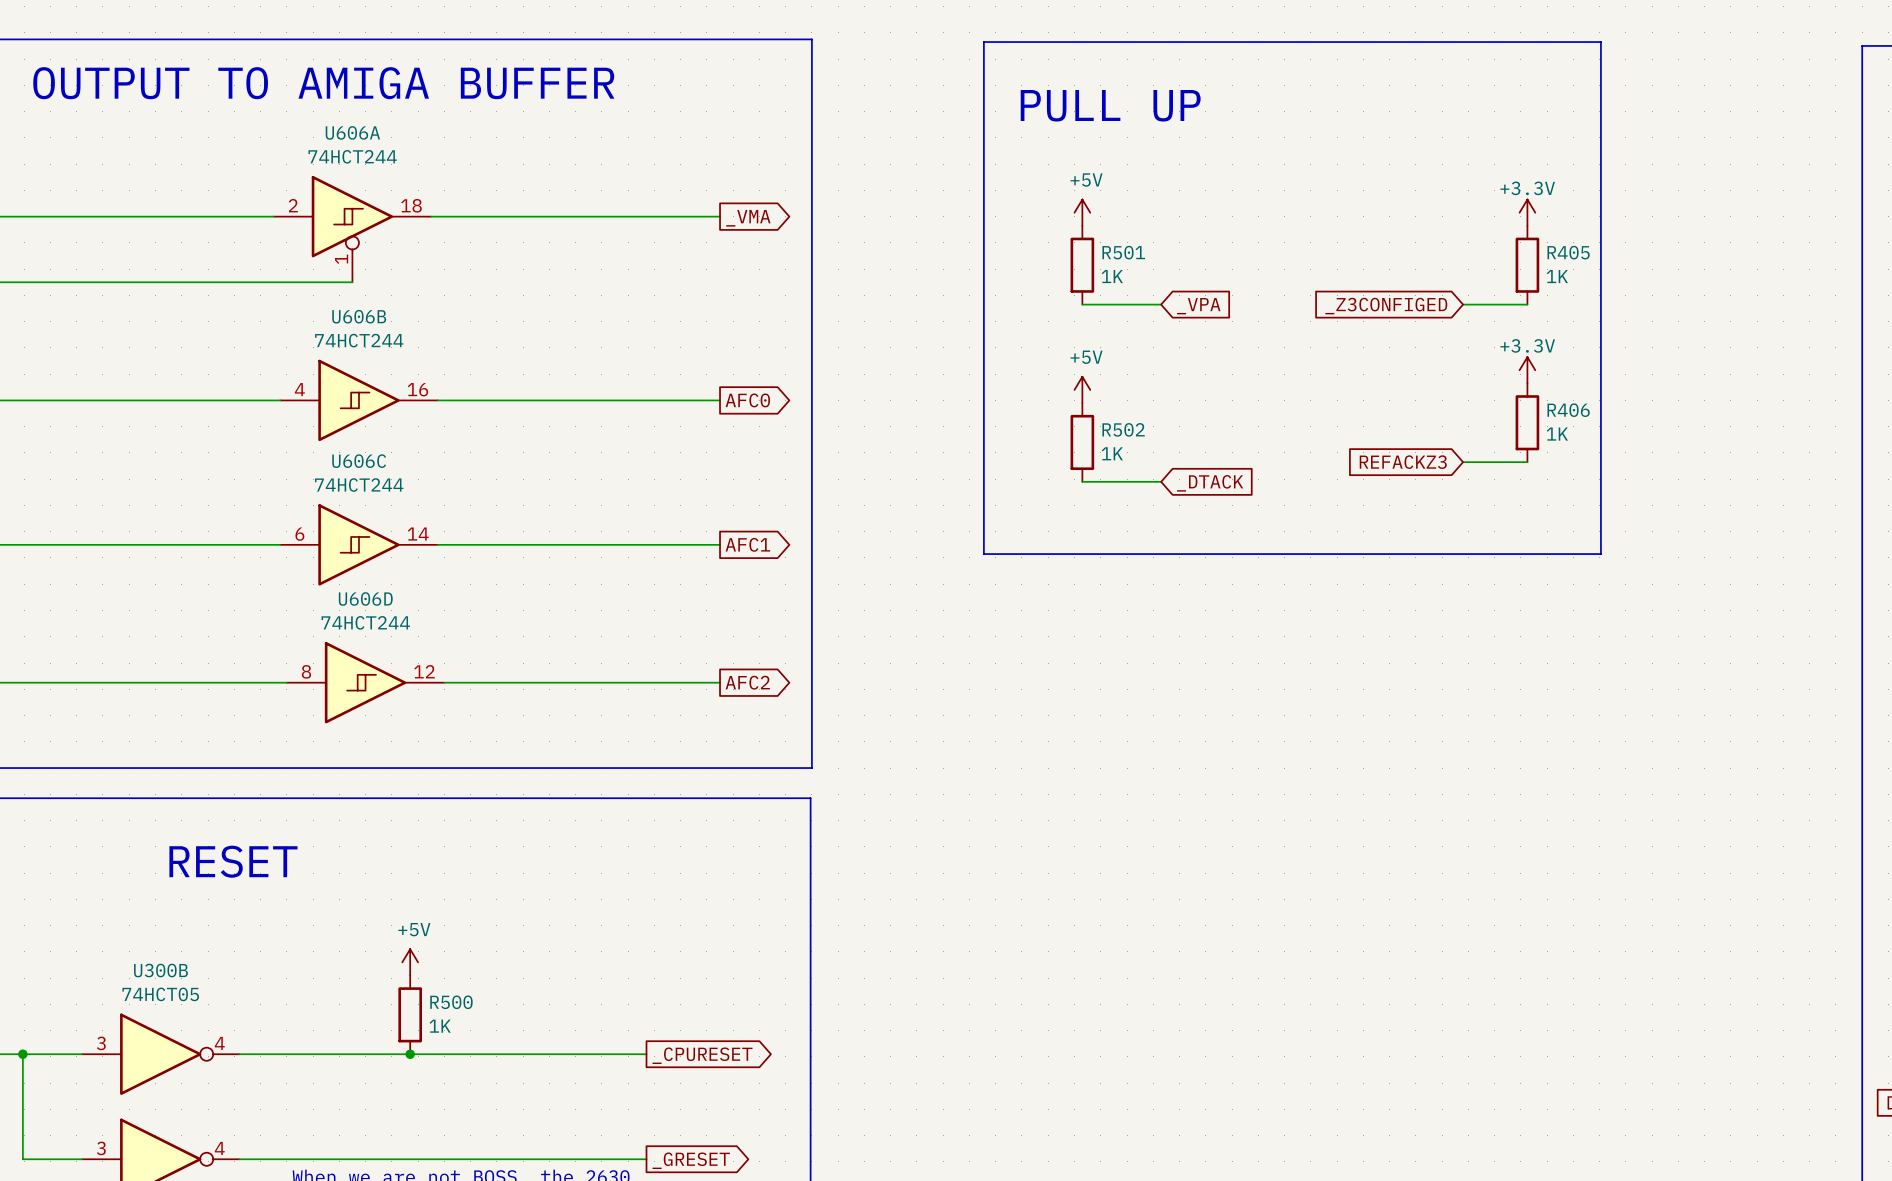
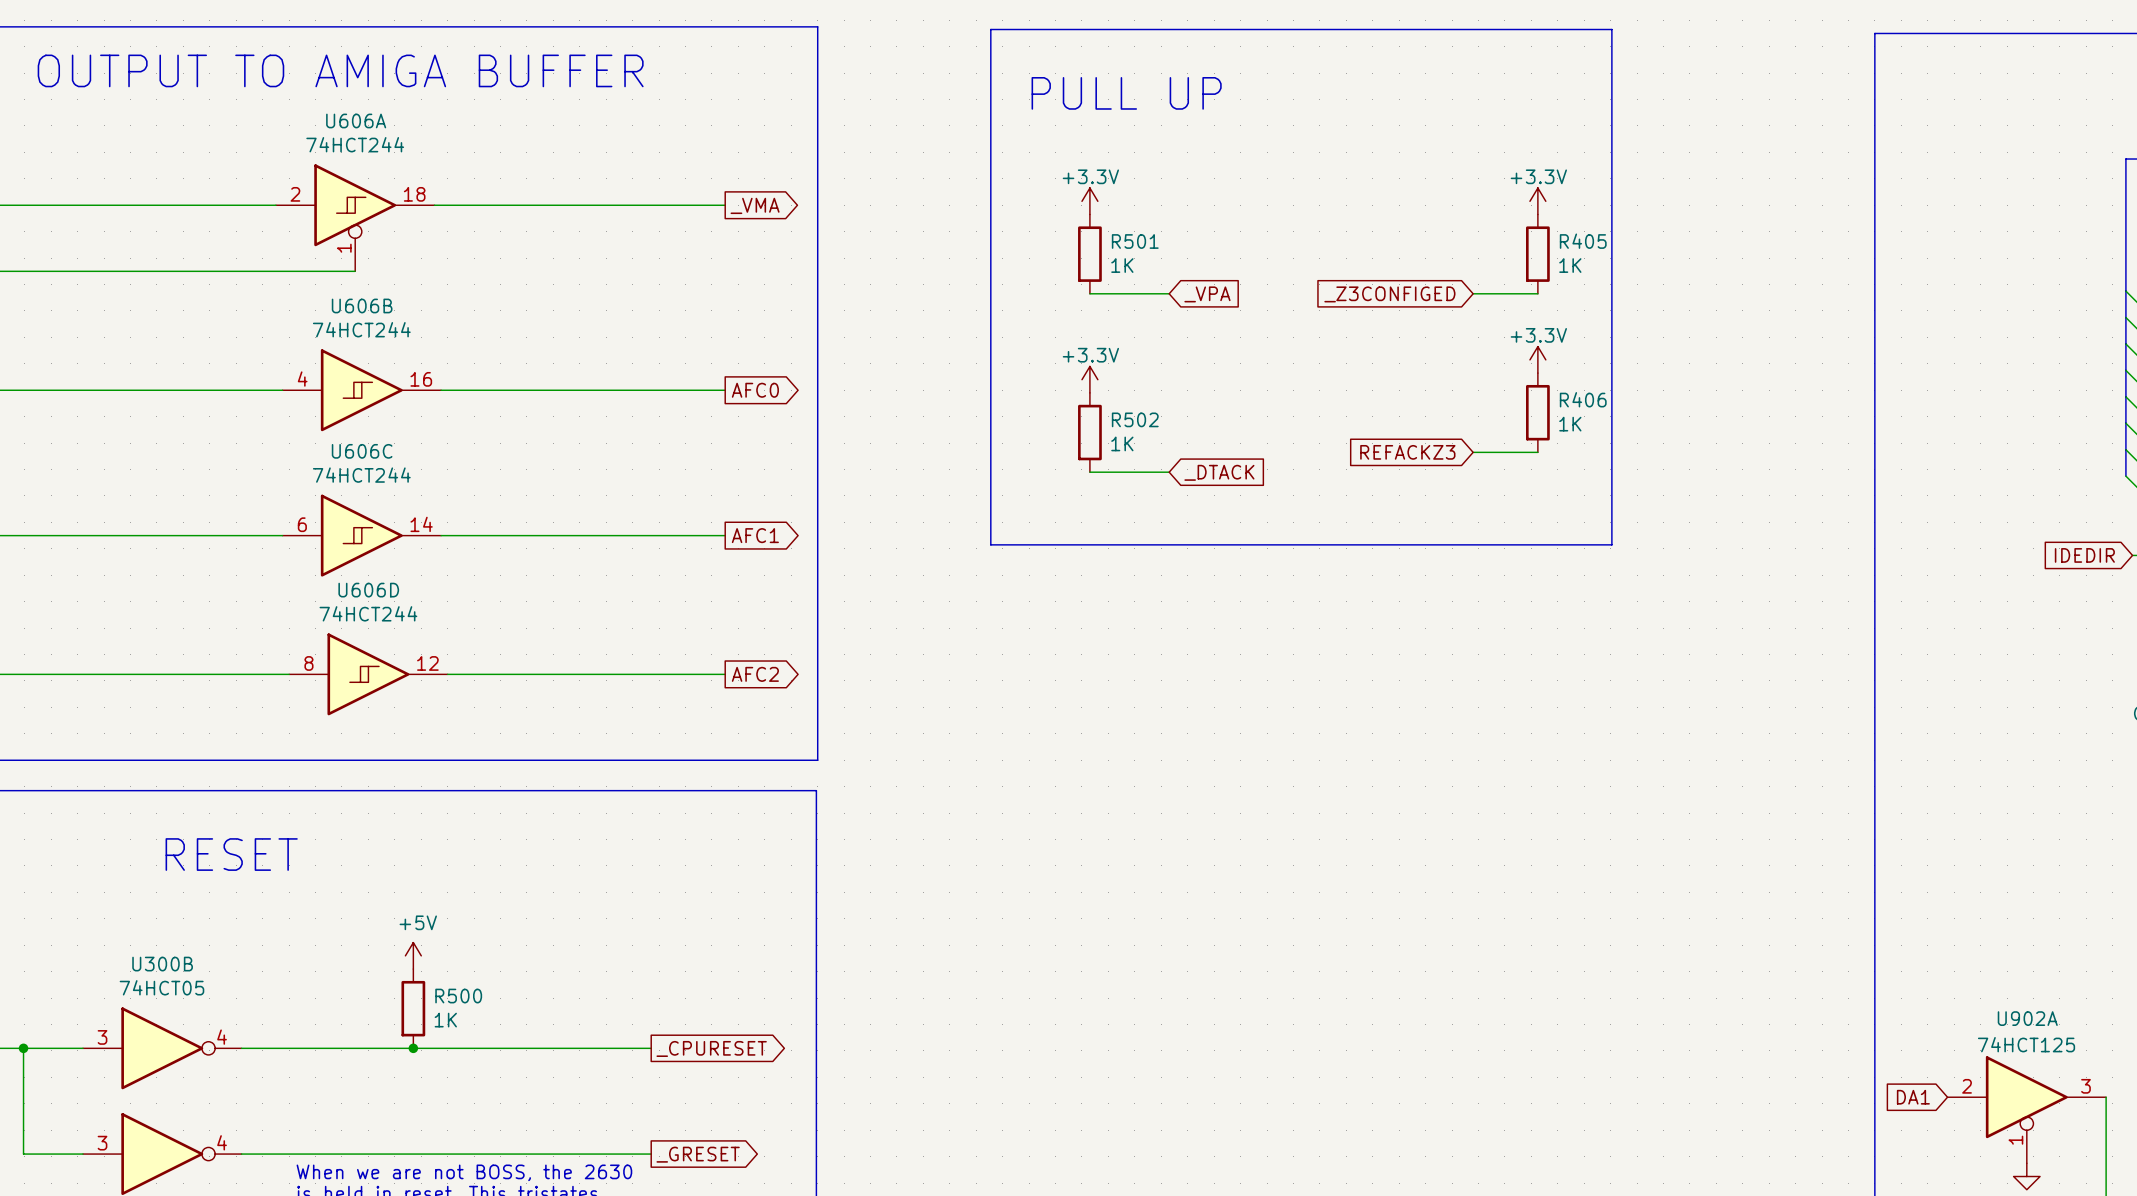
power symbol: +5V (1082, 212) -> +3.3V (1089, 201)
power symbol: +5V (1082, 389) -> +3.3V (1089, 379)

